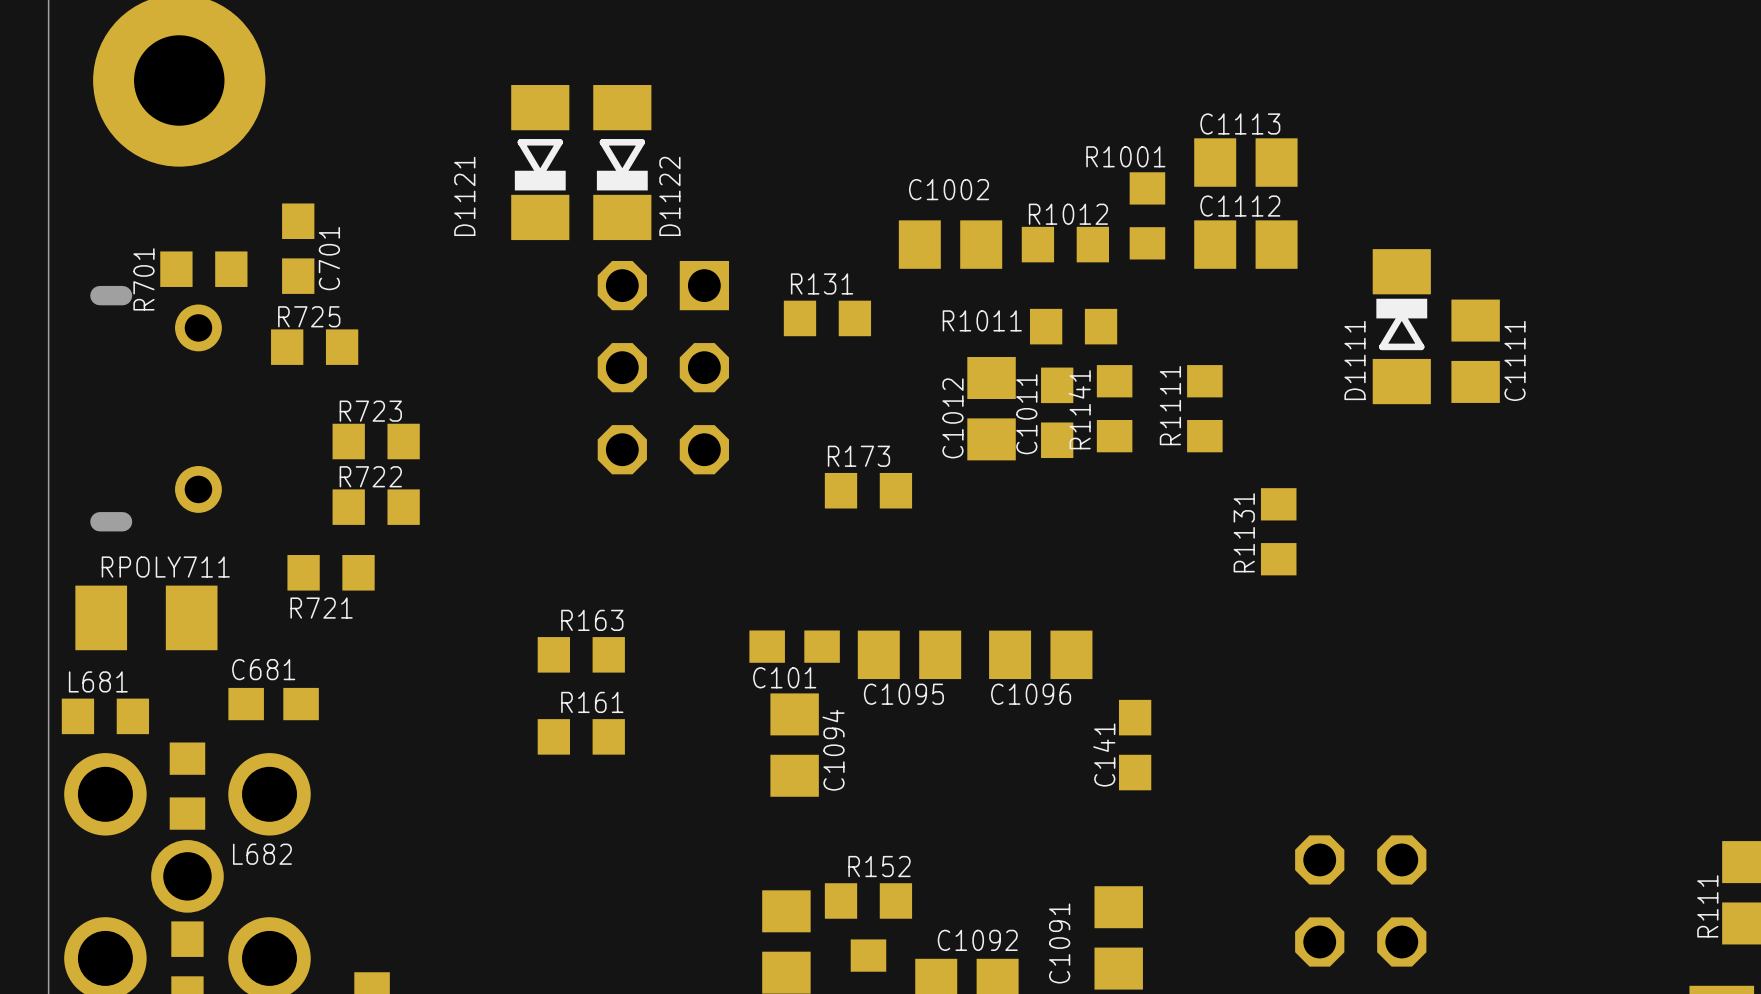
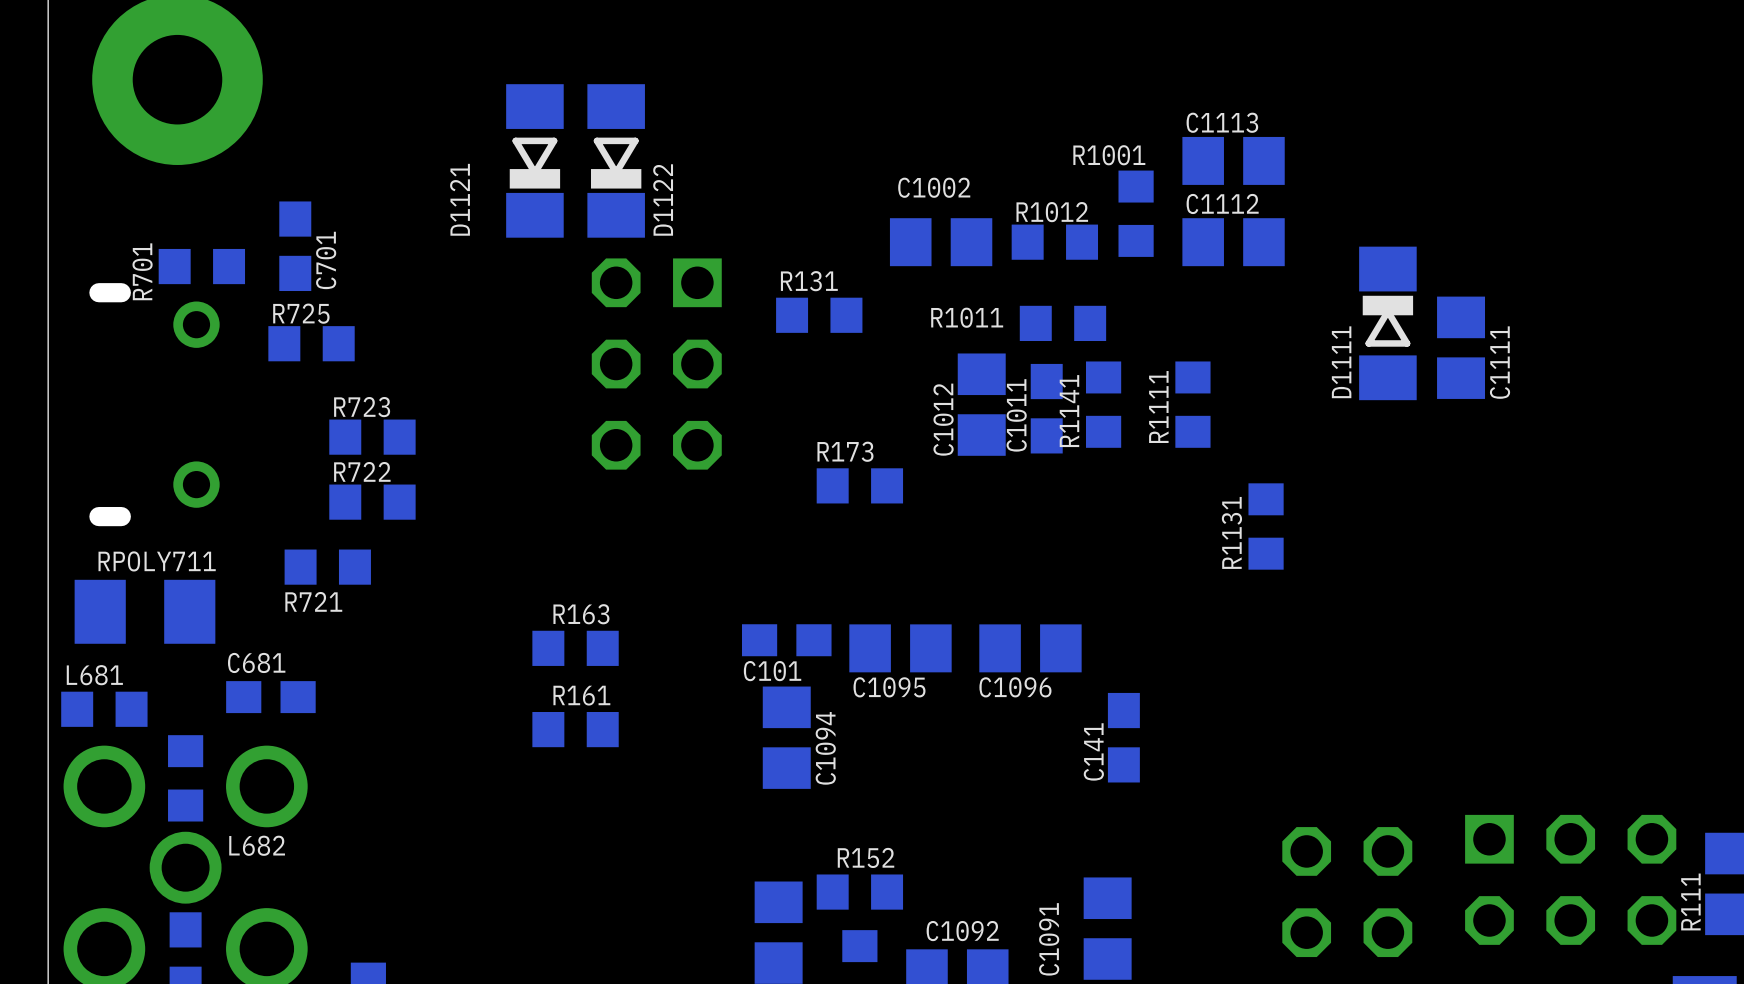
part: none -> (1570, 879)

